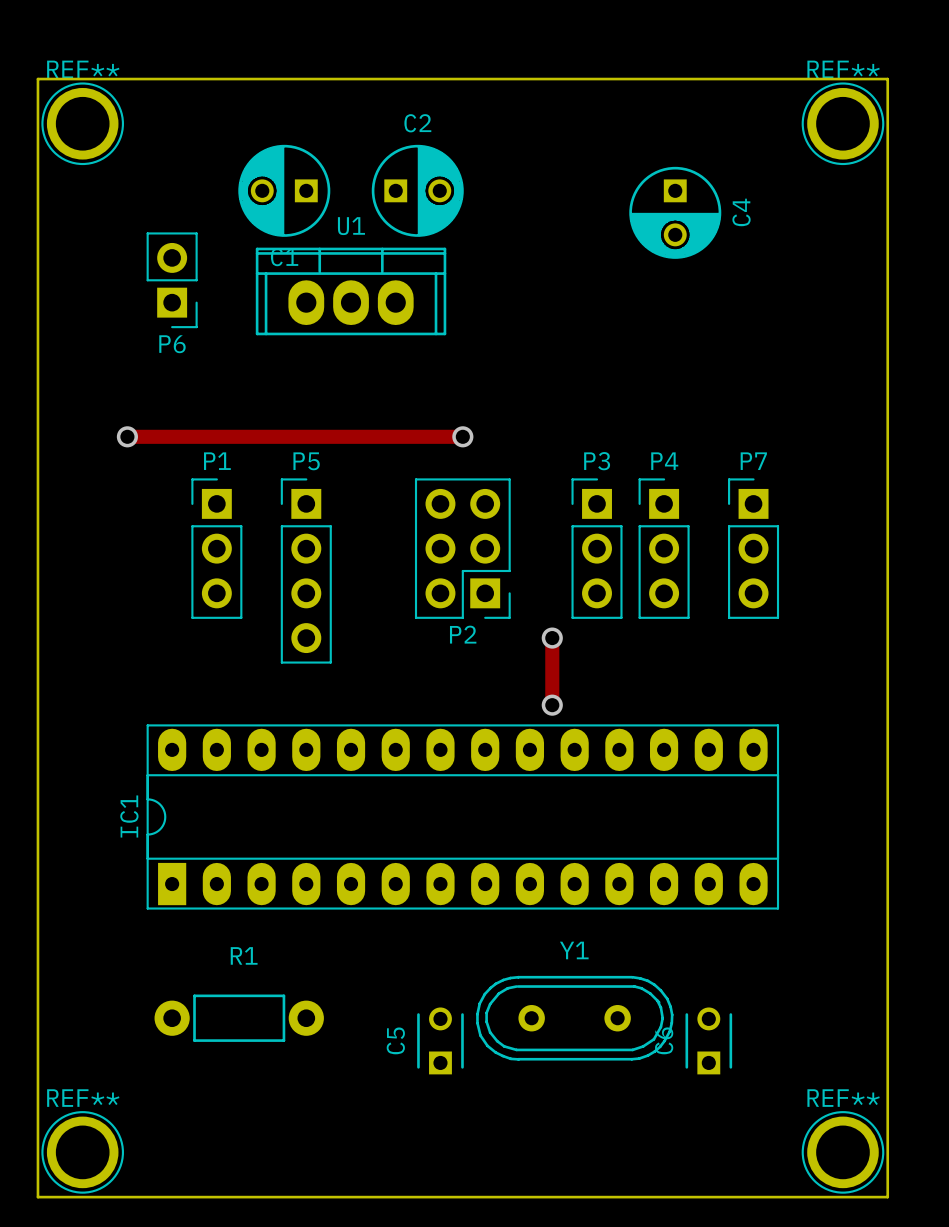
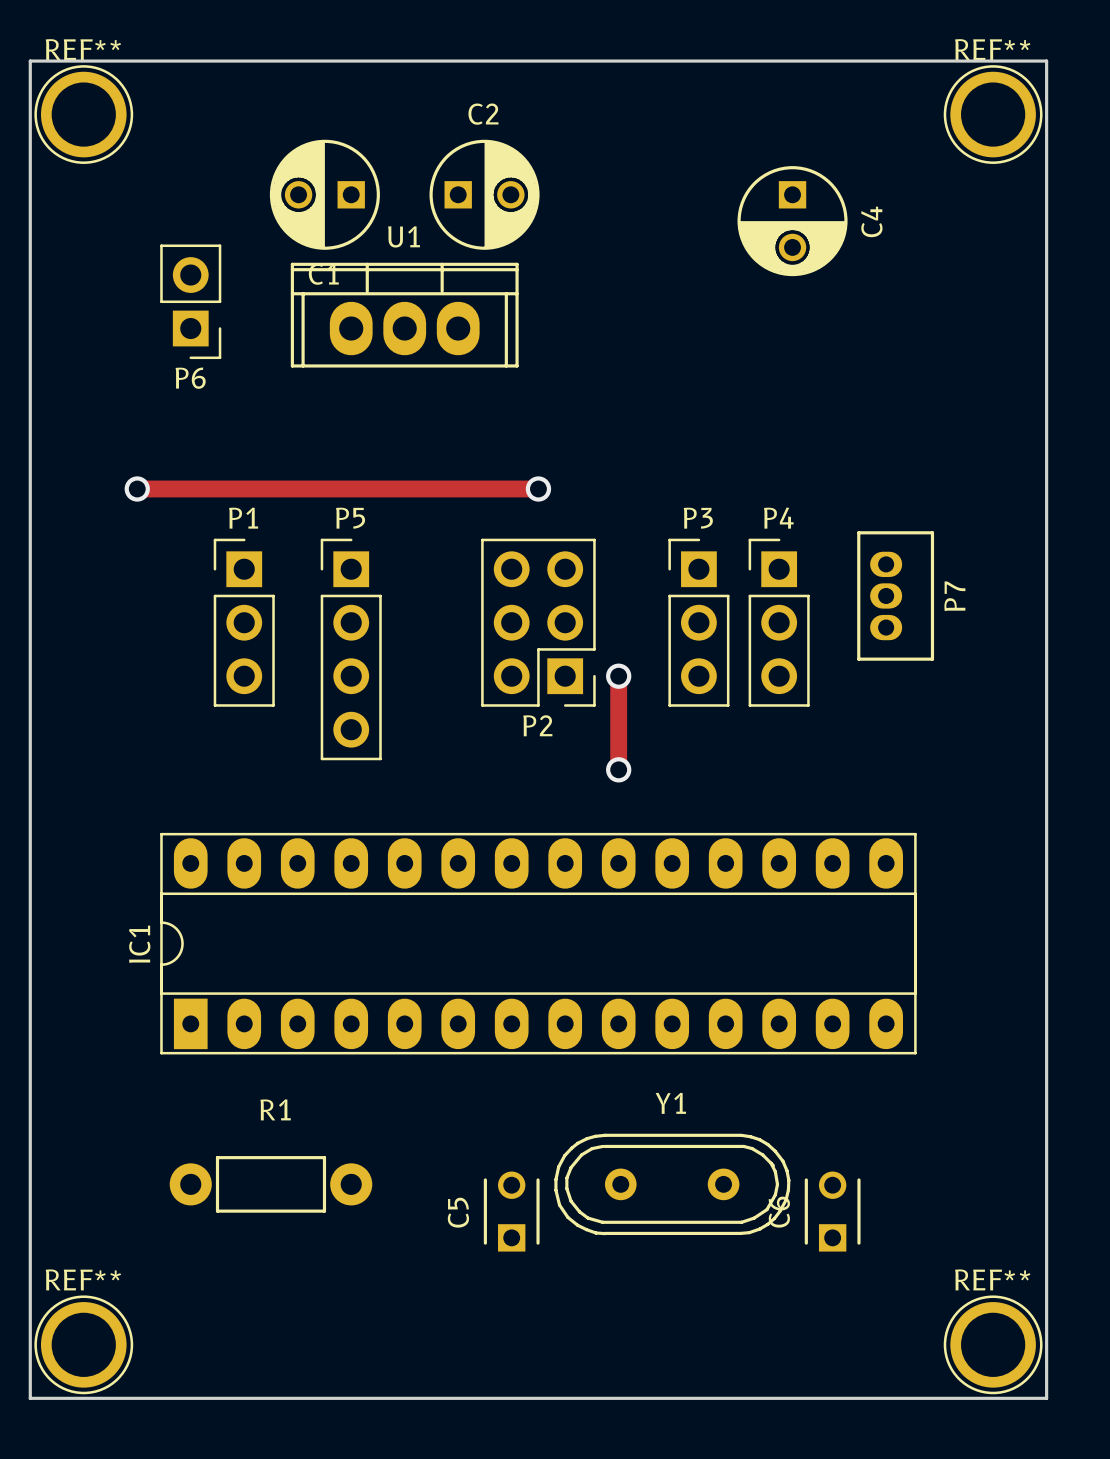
P7 name position: P7 (753, 461) -> P7 (954, 596)
P7 footprint: [728, 478, 780, 619] -> [857, 531, 935, 661]
track: none -> (618, 676) (618, 769)
via: none -> (618, 676)
track: (552, 638) (552, 705) -> none
via: (552, 638) -> none
via: none -> (618, 769)
via: (552, 705) -> none

